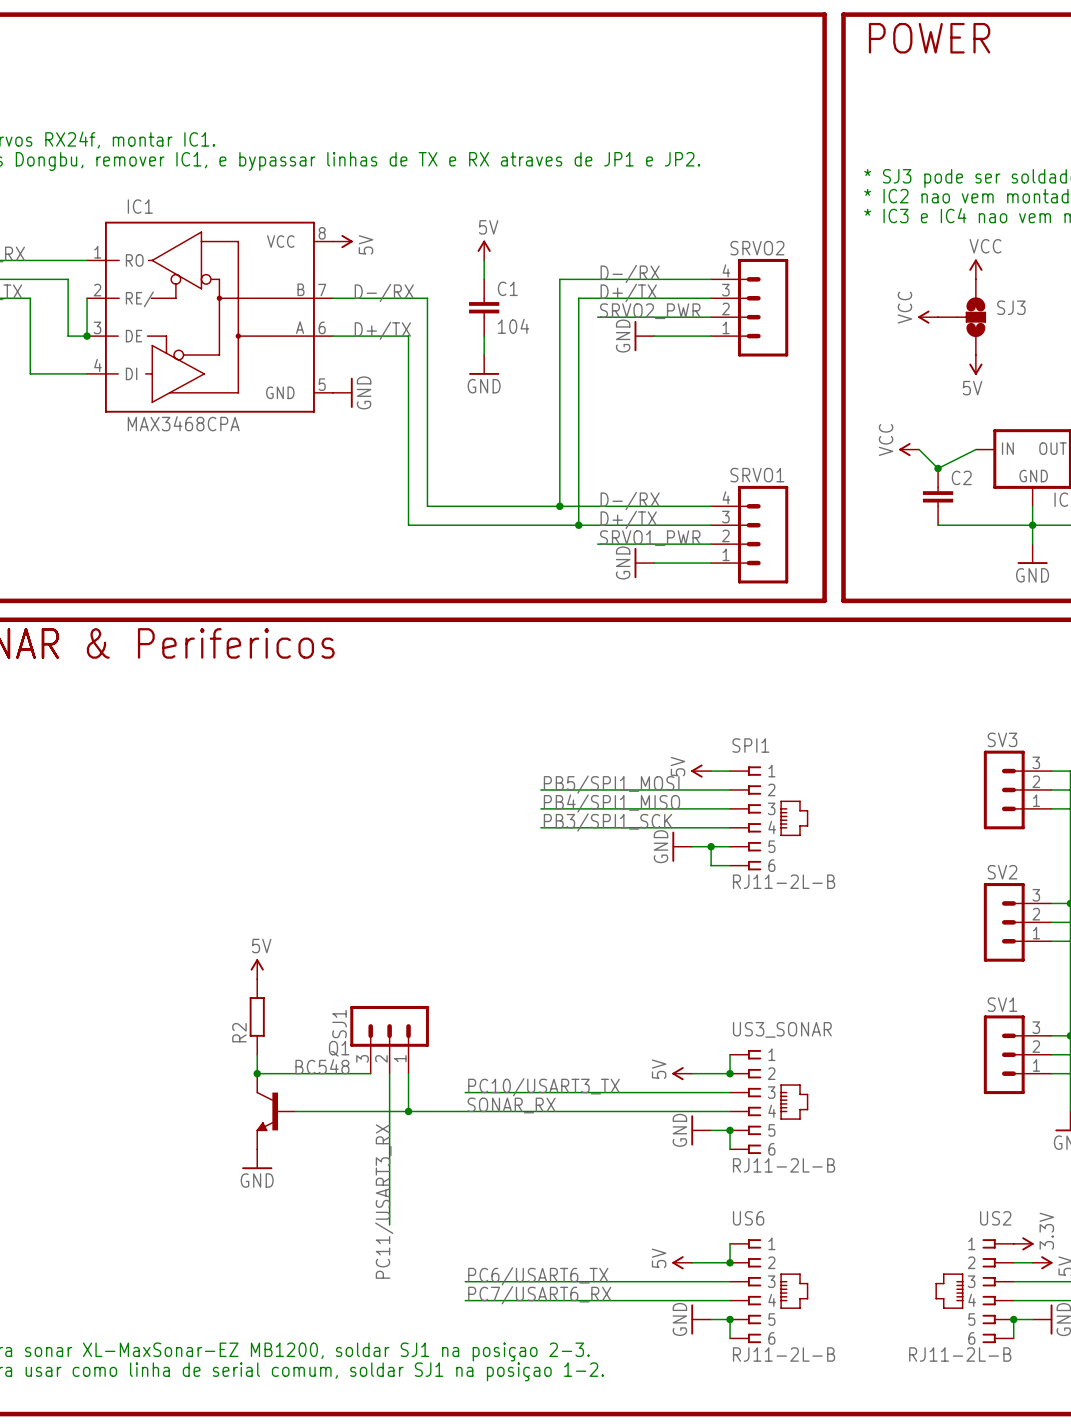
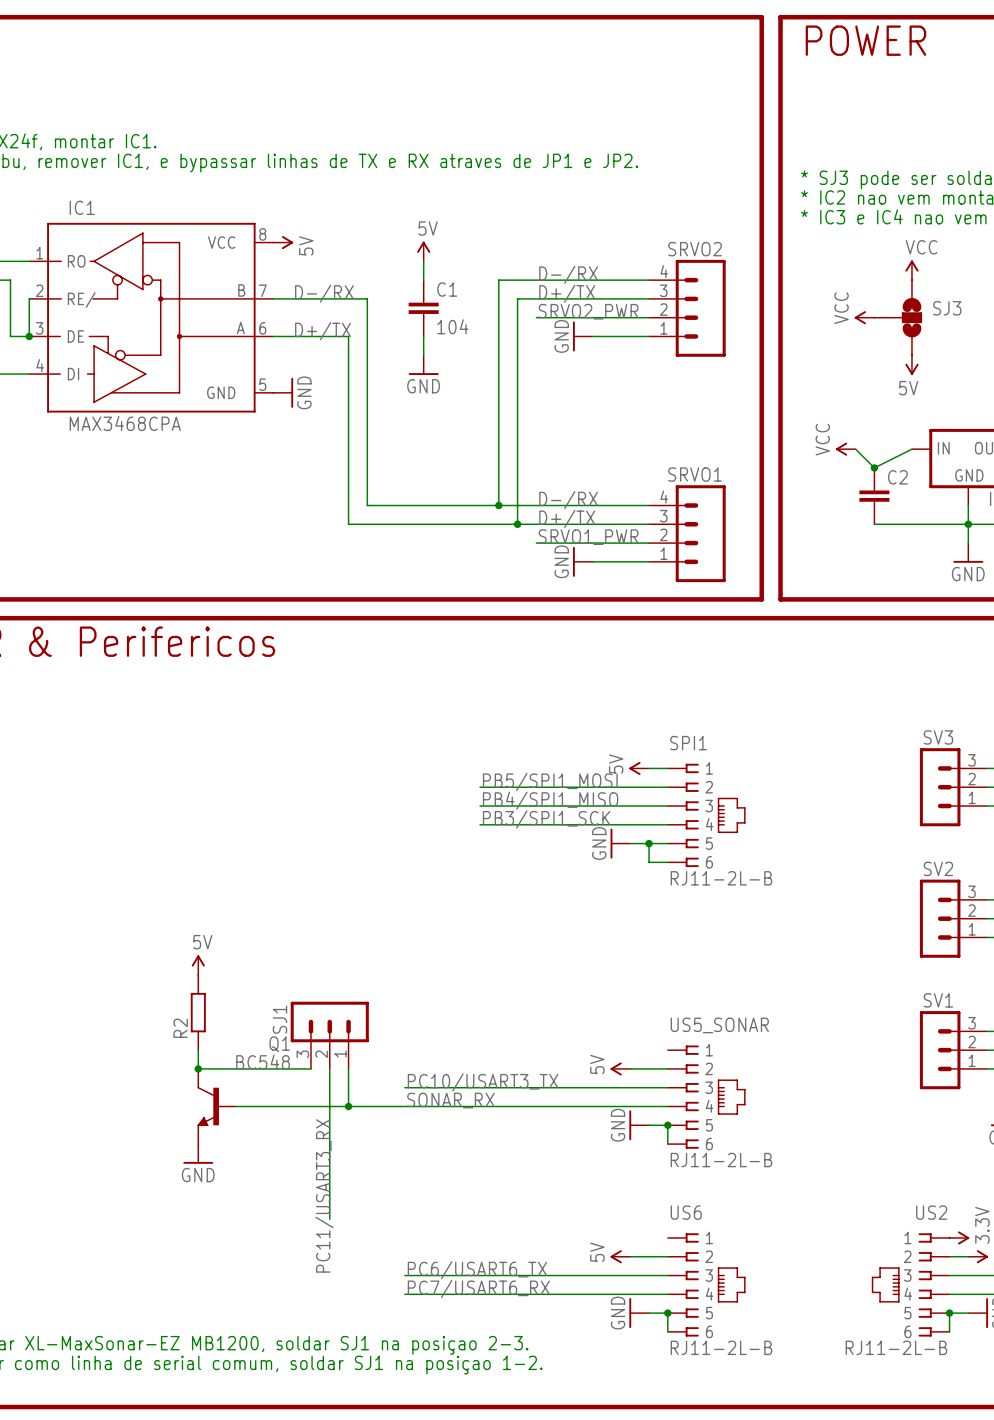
US3_SONAR name: US3_SONAR (782, 1029) -> US5_SONAR (719, 1025)
wire: (730, 1054) (730, 1073) -> none
junction: (730, 1073) -> none
wire: (730, 1243) (730, 1262) -> none
junction: (730, 1262) -> none

